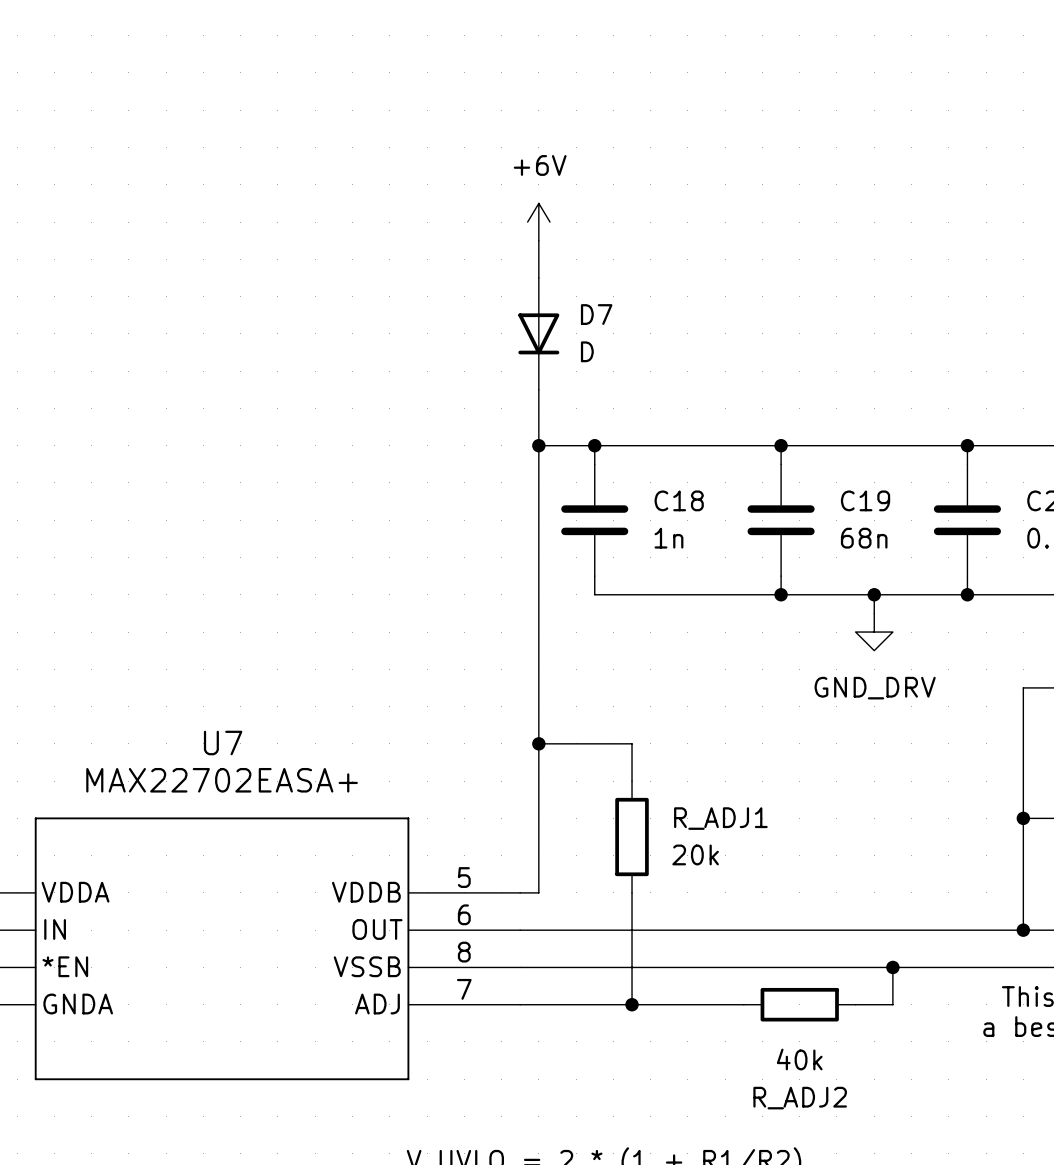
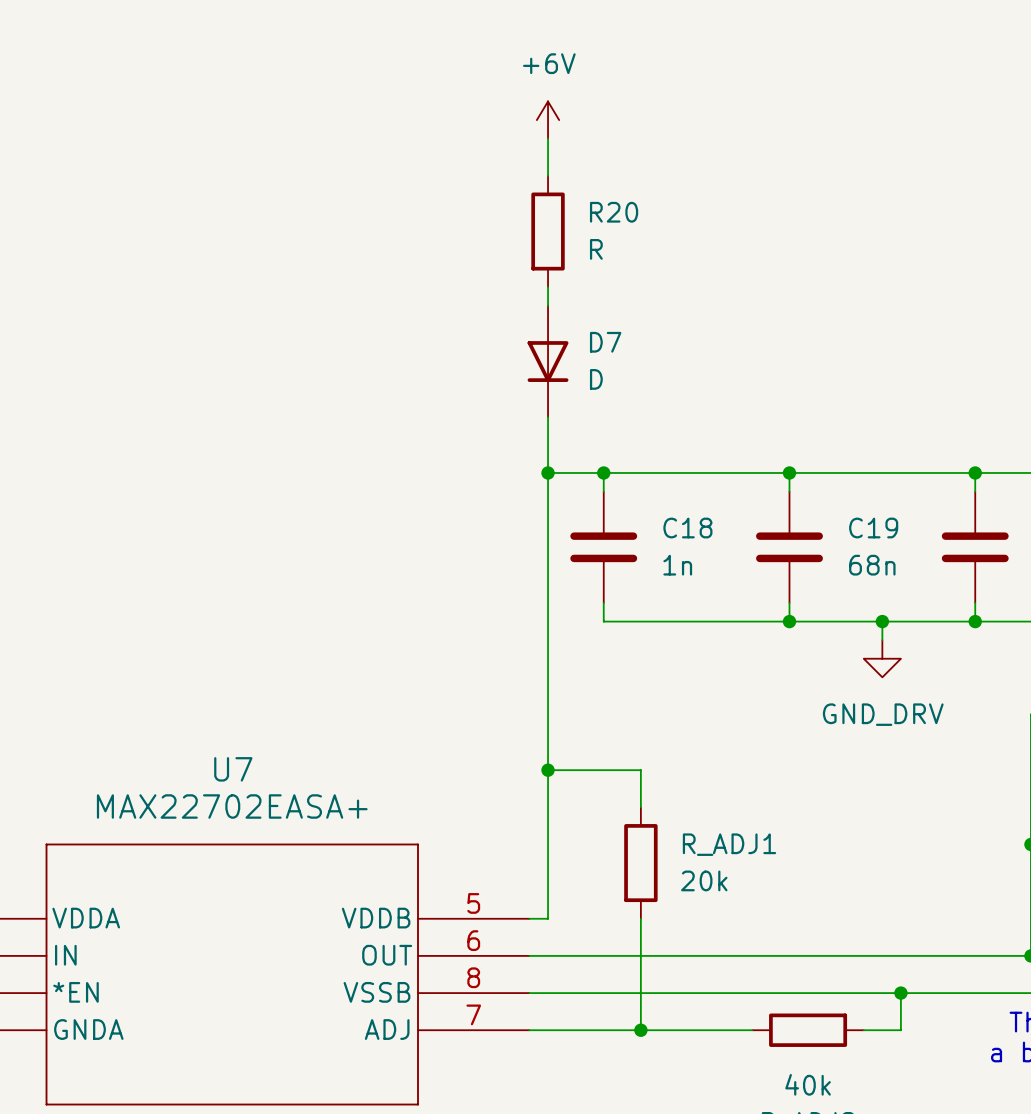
wire: none -> (548, 138) (548, 175)
R20: none -> R (548, 231)
power symbol position: +6V (538, 222) -> +6V (548, 120)

